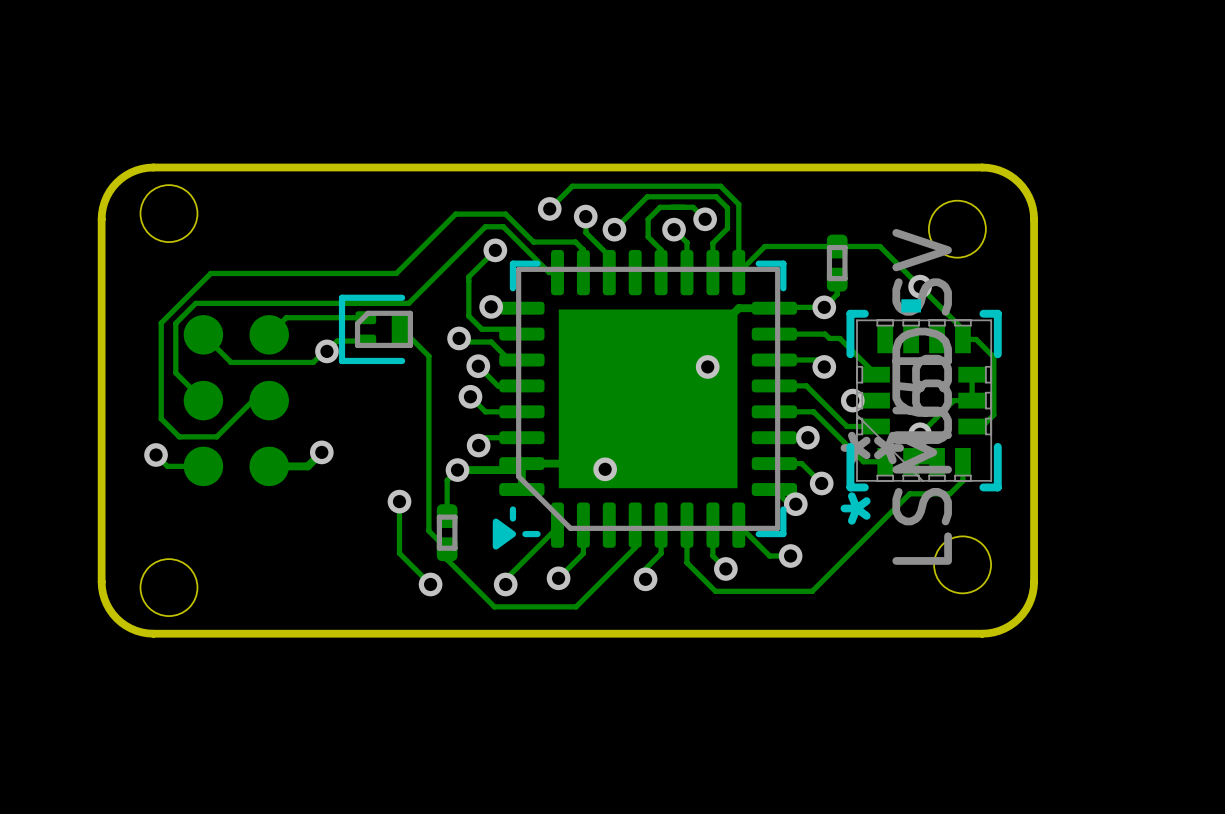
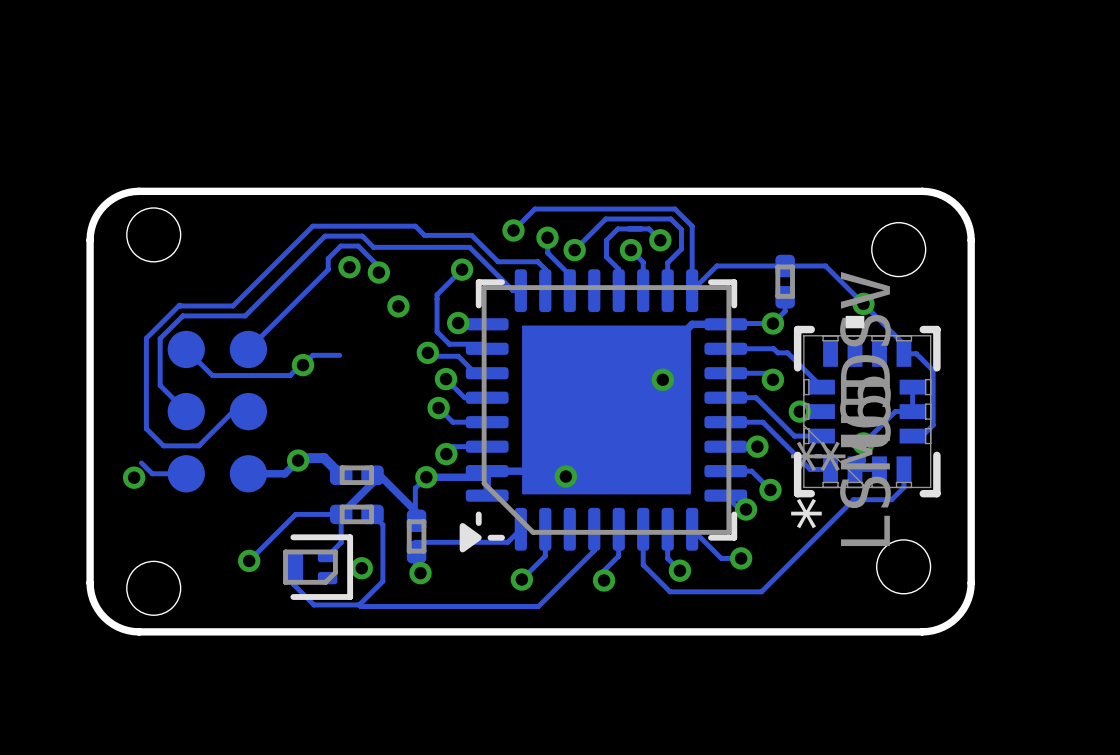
track: (455, 214) (396, 273) (210, 273) (196, 288) -> (424, 235) (415, 226) (312, 226) (233, 305) (179, 305)
track: (485, 226) (408, 303) (195, 303) -> (452, 247) (373, 247) (362, 236) (325, 236) (245, 315) (182, 315) (179, 319)
via: none -> (349, 267)
via: none -> (378, 272)
via: none -> (398, 306)
track: (365, 317) (286, 317) -> (378, 272) (376, 272) (376, 264) (358, 246) (340, 246) (328, 258) (328, 269) (264, 333)
part rotation: 0° (375, 329) -> 180° (318, 567)
part position: (375, 329) -> (318, 567)
track: (402, 329) (428, 356) (428, 531) (447, 549) (447, 559) (494, 606) -> (359, 604) (360, 606) (461, 606)
track: none -> (307, 458) (324, 458) (341, 475)
via position: (156, 454) -> (134, 477)
part: none -> (356, 475)
track: (447, 480) (447, 516) -> (416, 487) (415, 510) (379, 475) (372, 475) (372, 483) (341, 514)
track: (399, 501) (399, 553) (430, 584) -> none
via: (399, 501) -> none
track: none -> (341, 514) (295, 514) (249, 560)
track: none -> (341, 514) (341, 542) (327, 556)
part: none -> (356, 514)
track: none -> (372, 514) (382, 524) (382, 581) (359, 604)
track: none -> (519, 530) (507, 542) (415, 542) (415, 568) (420, 573)
track: (555, 529) (508, 576) (508, 581) (505, 584) -> none
via: none -> (249, 560)
track: none -> (293, 567) (293, 584) (314, 604) (359, 604)
via: none -> (361, 568)
via position: (430, 584) -> (420, 573)
via: (505, 584) -> none

